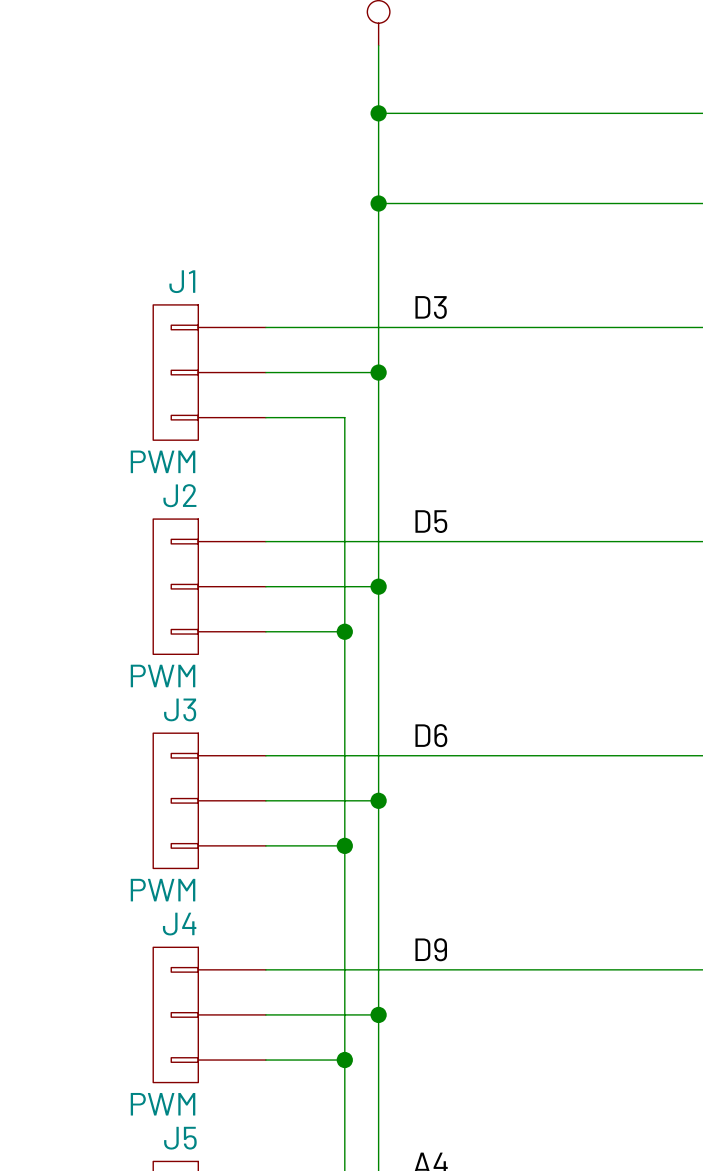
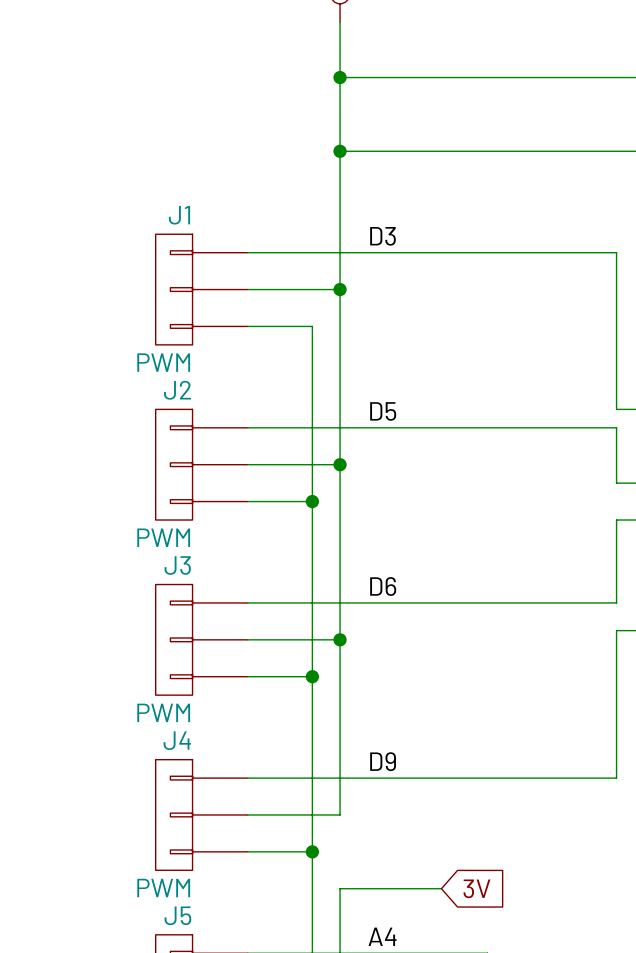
wire: (378, 1014) (378, 1105) -> (441, 888) (340, 888)
junction: (378, 1014) -> none
global label: none -> 3V (476, 888)

